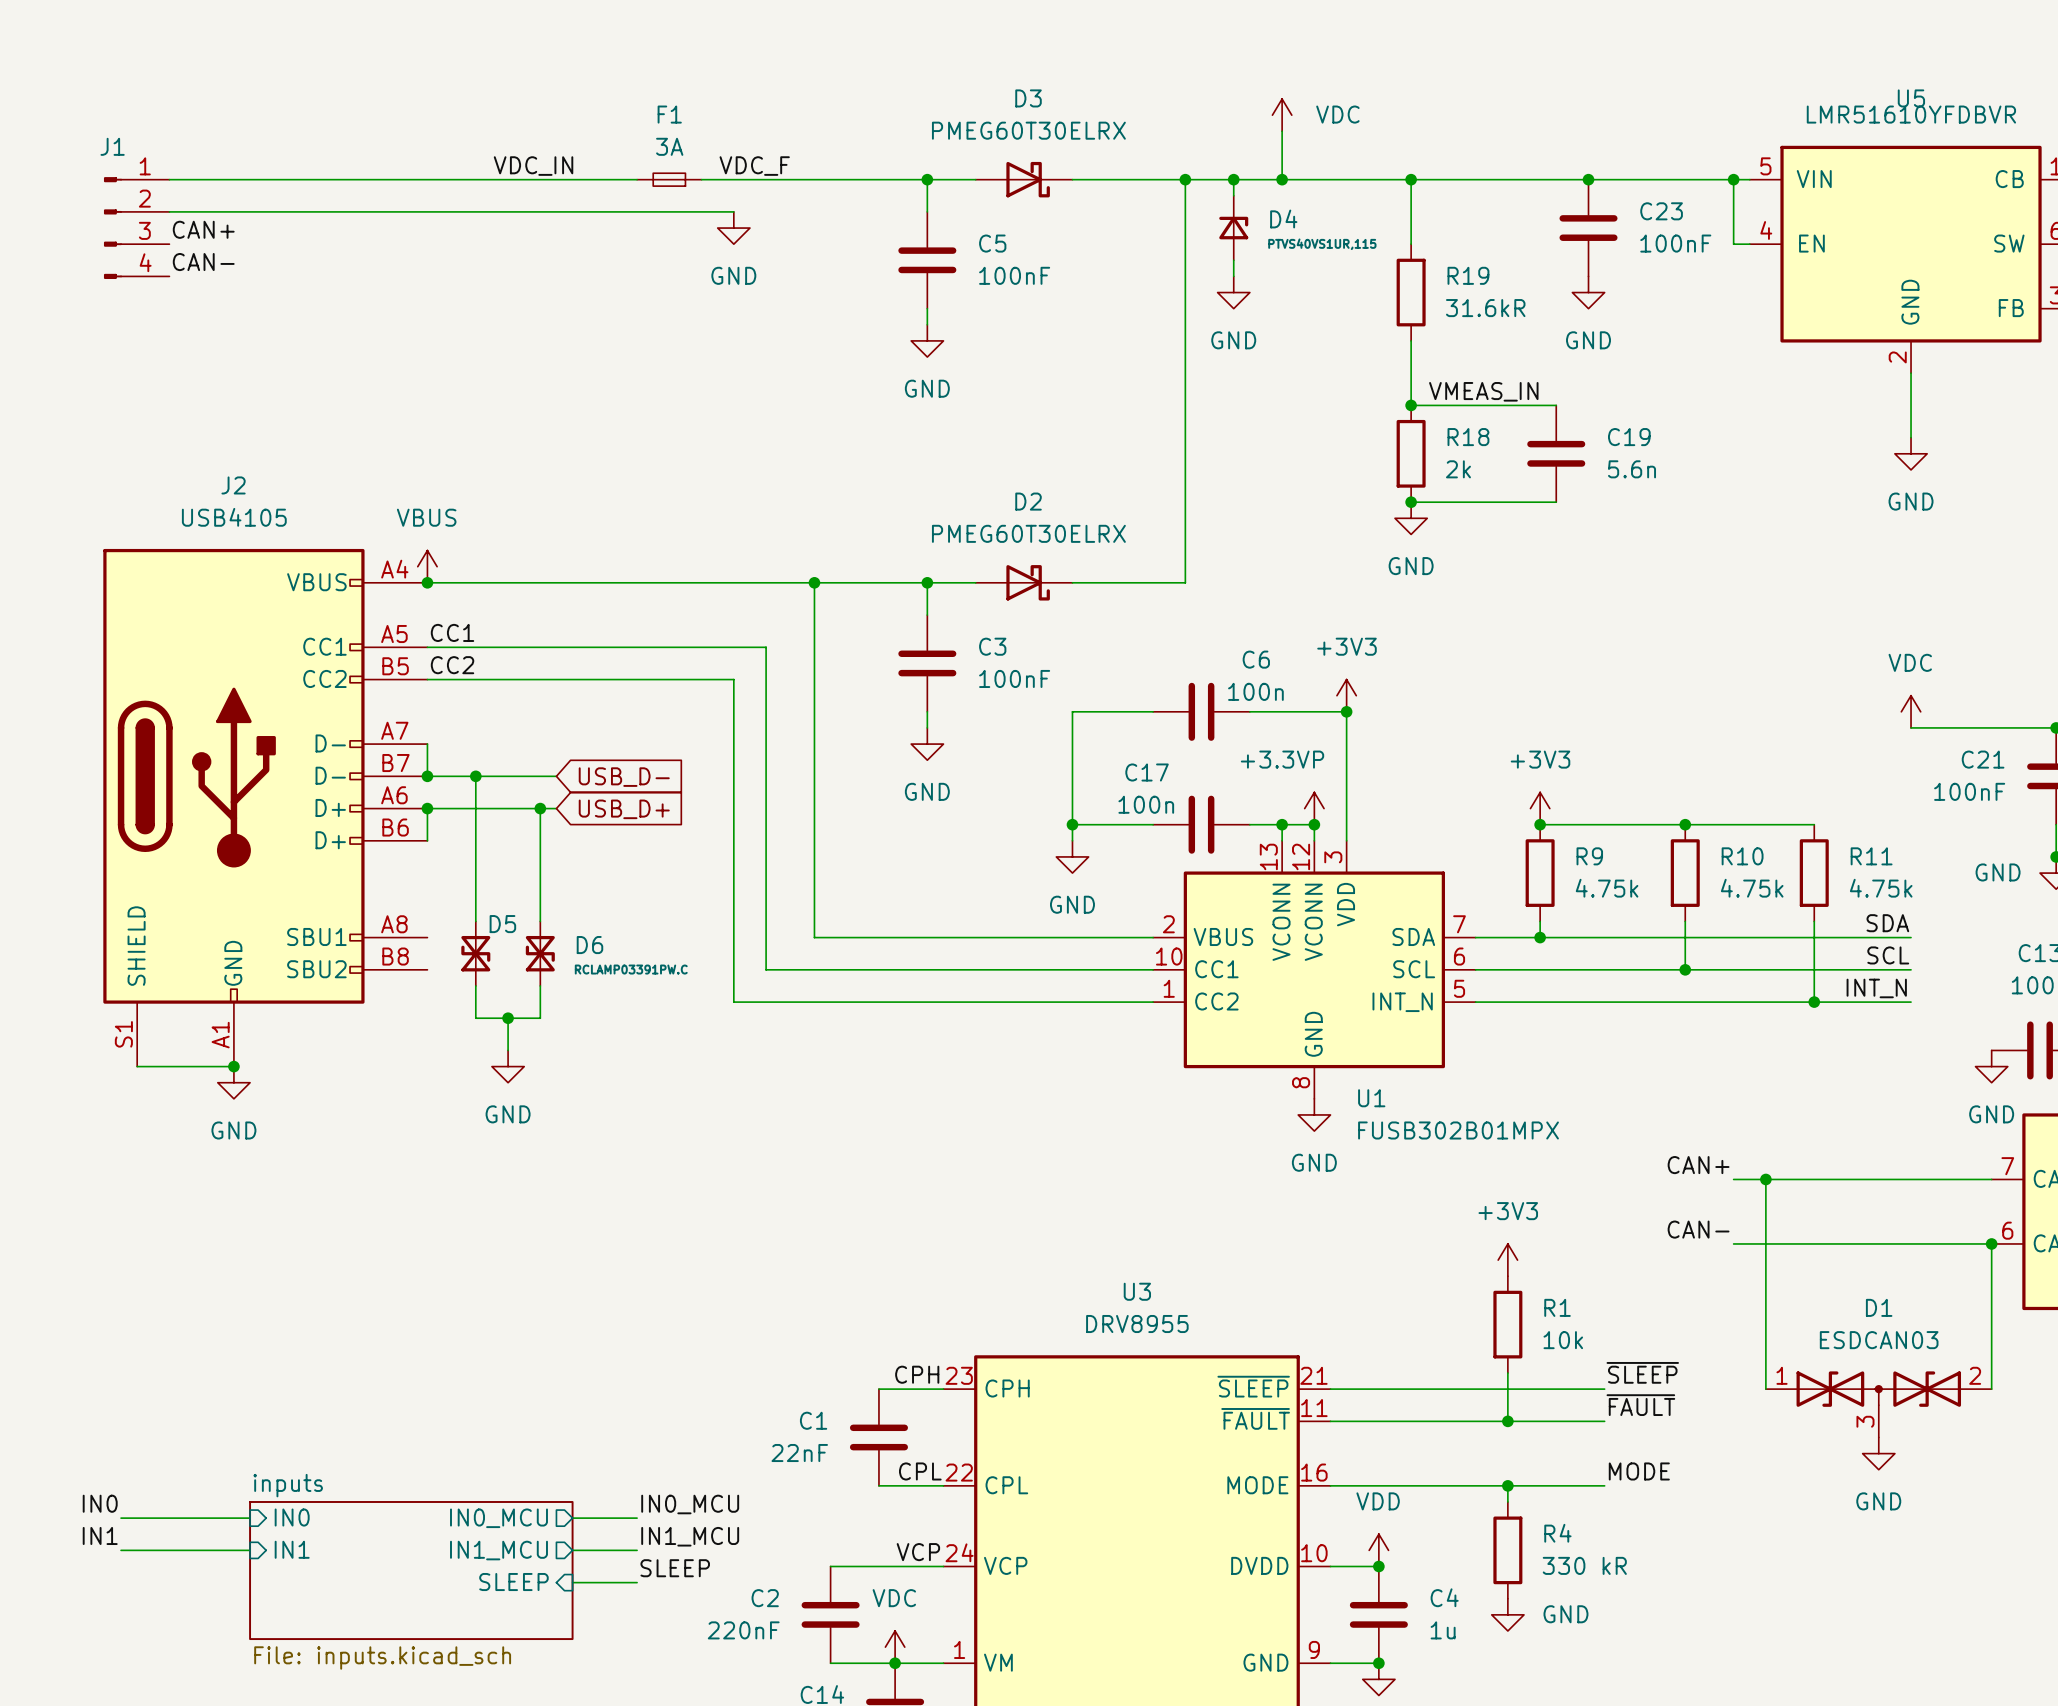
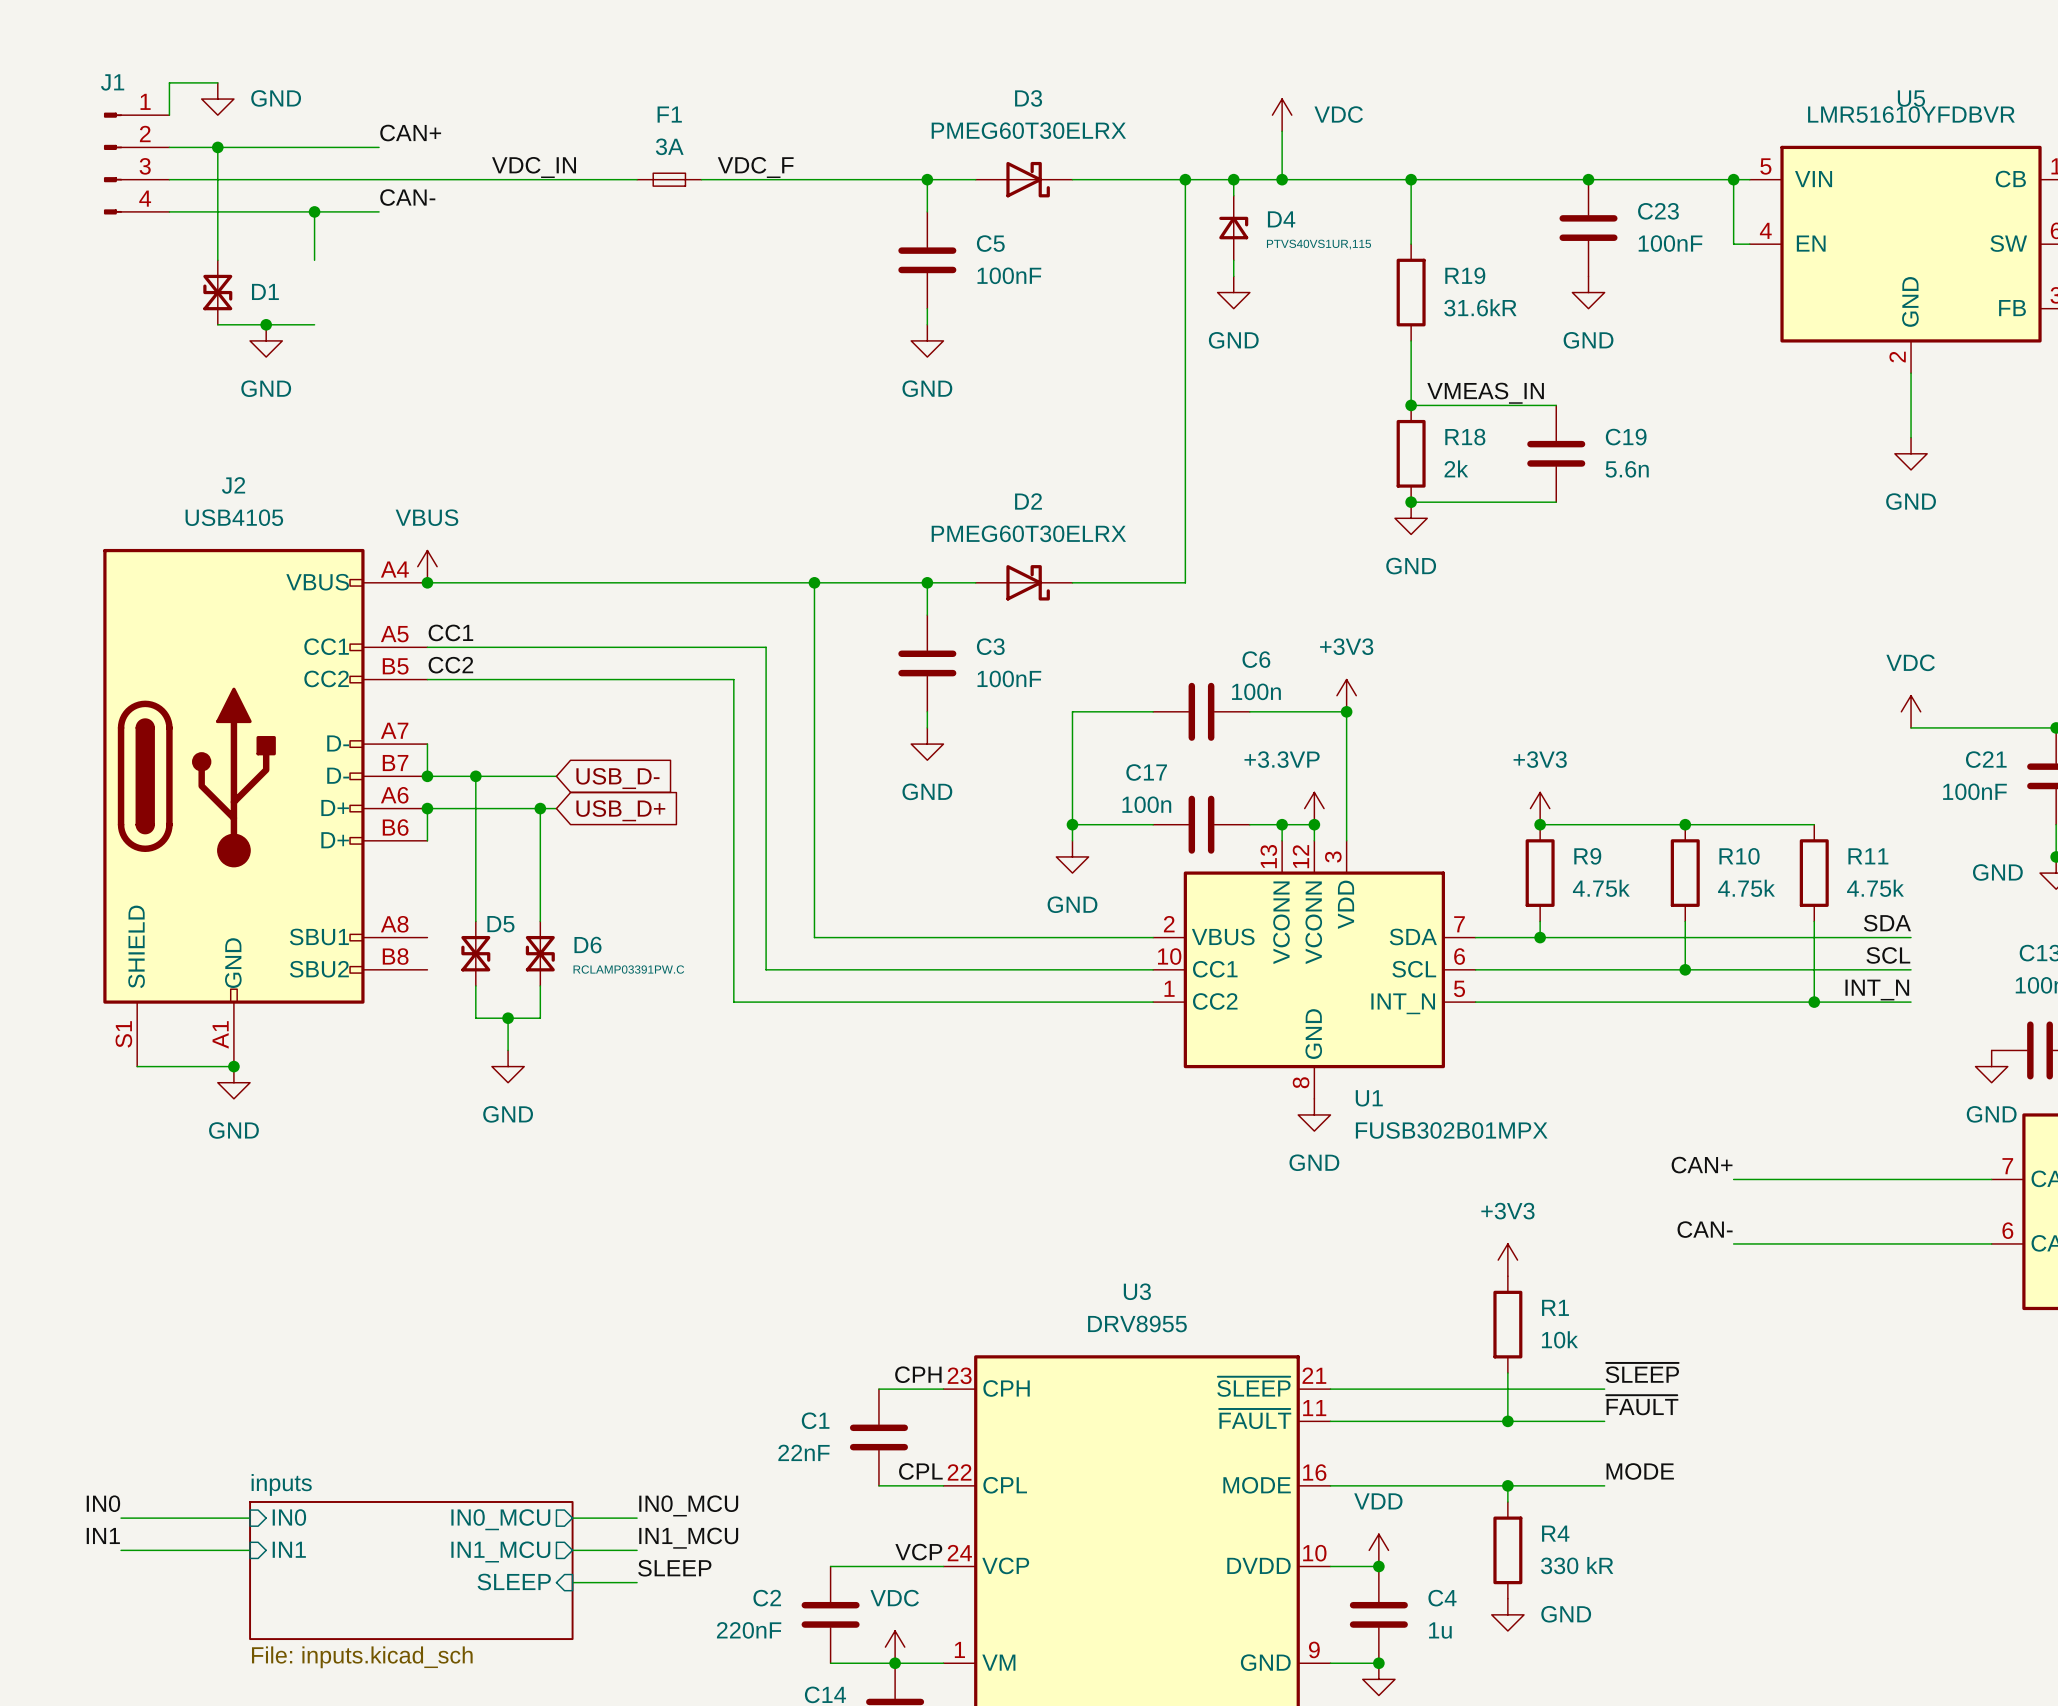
wire: none -> (217, 82) (169, 82) (169, 115)
power symbol: none -> GND (217, 99)
wire: none -> (169, 147) (379, 147)
wire: none -> (217, 147) (217, 260)
junction: none -> (217, 147)
wire: none -> (314, 211) (314, 260)
junction: none -> (314, 211)
wire: (379, 211) (733, 211) -> none
J1 position: (136, 228) -> (136, 163)
power symbol: GND (733, 228) -> none
label position: CAN+ (203, 229) -> CAN+ (410, 133)
label position: CAN- (203, 262) -> CAN- (407, 197)
wire: none -> (217, 324) (314, 324)
junction: none -> (266, 324)
power symbol: none -> GND (266, 340)
wire: (1765, 1179) (1765, 1389) -> none
junction: (1765, 1179) -> none
wire: (1991, 1243) (1991, 1389) -> none
junction: (1991, 1243) -> none
D1 name position: D1 (1879, 1307) -> D1 (265, 291)
D1 value: ESDCAN03 (1879, 1340) -> none
D1 symbol: [1765, 1371, 1992, 1438] -> [203, 260, 233, 325]
power symbol: GND (1878, 1453) -> none

